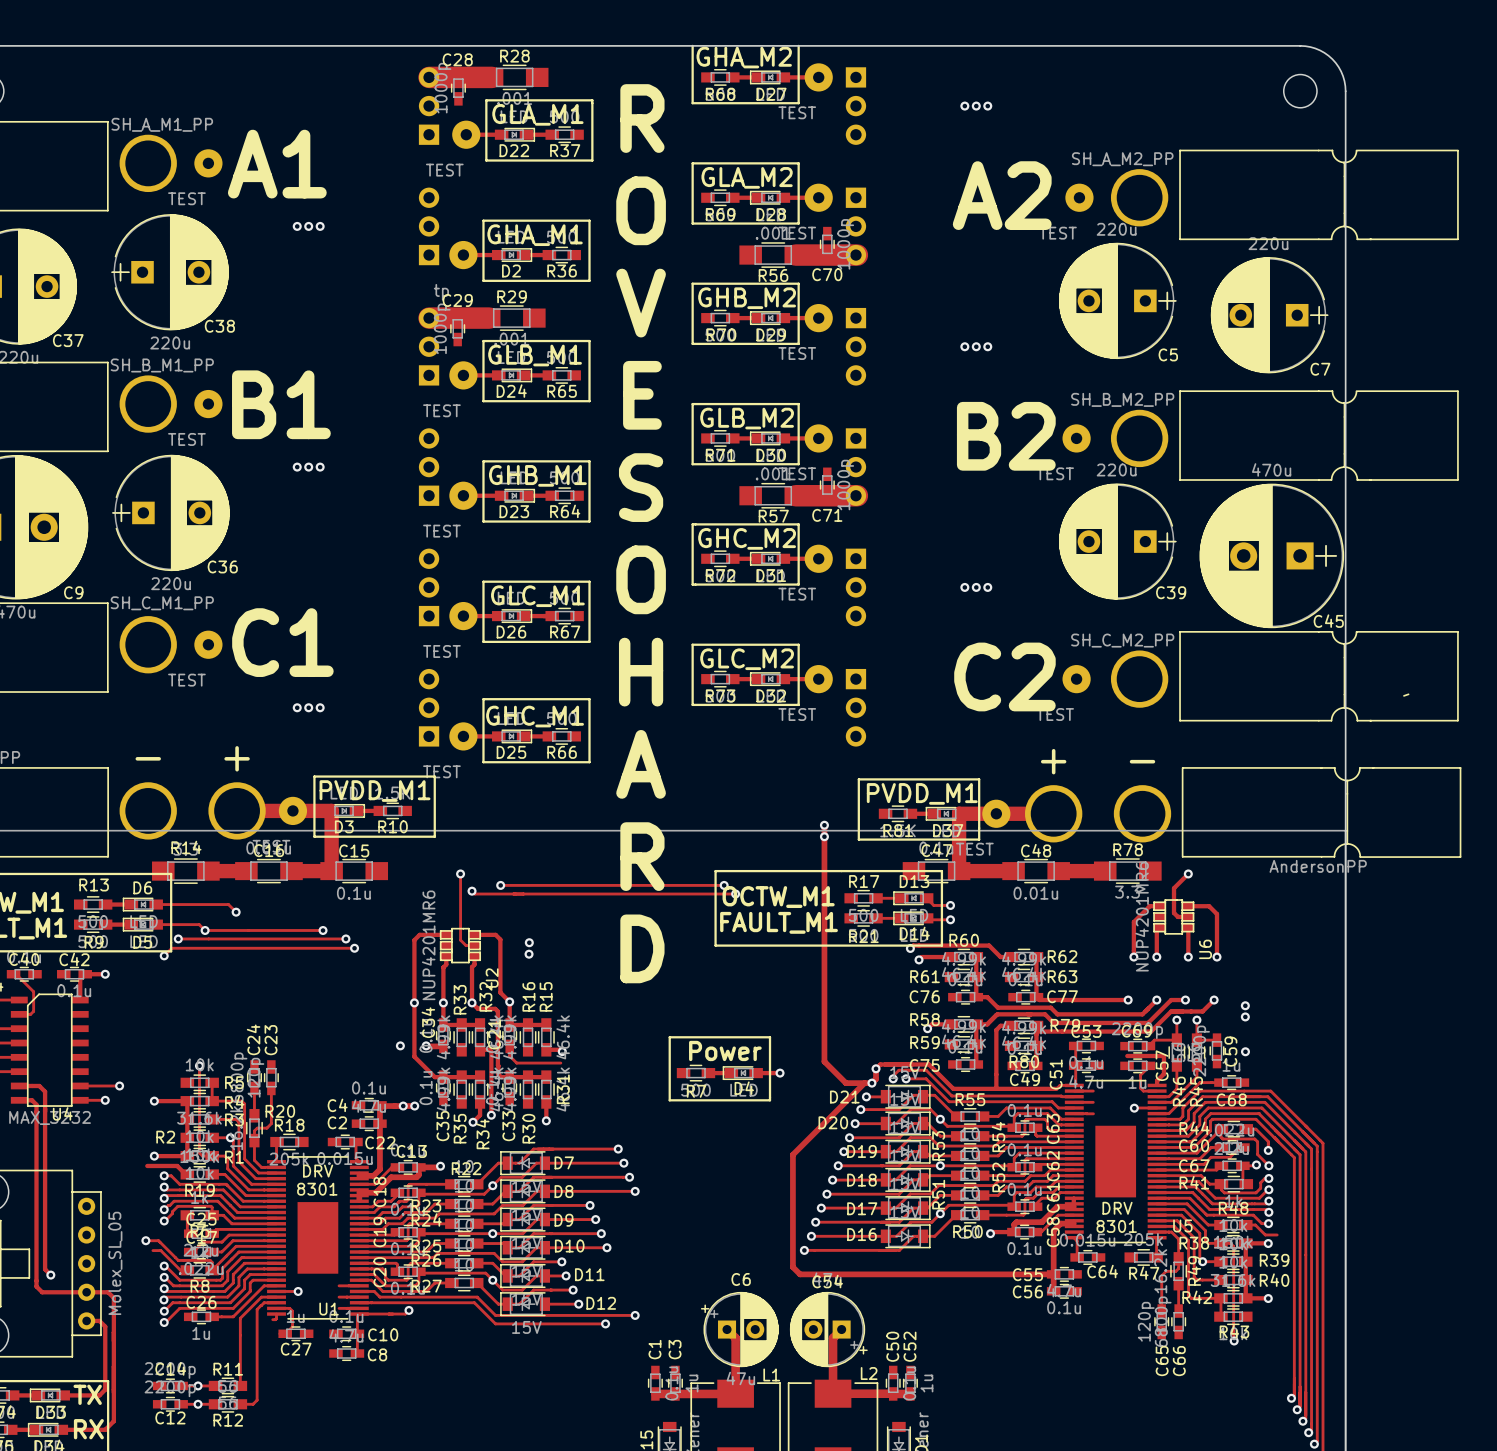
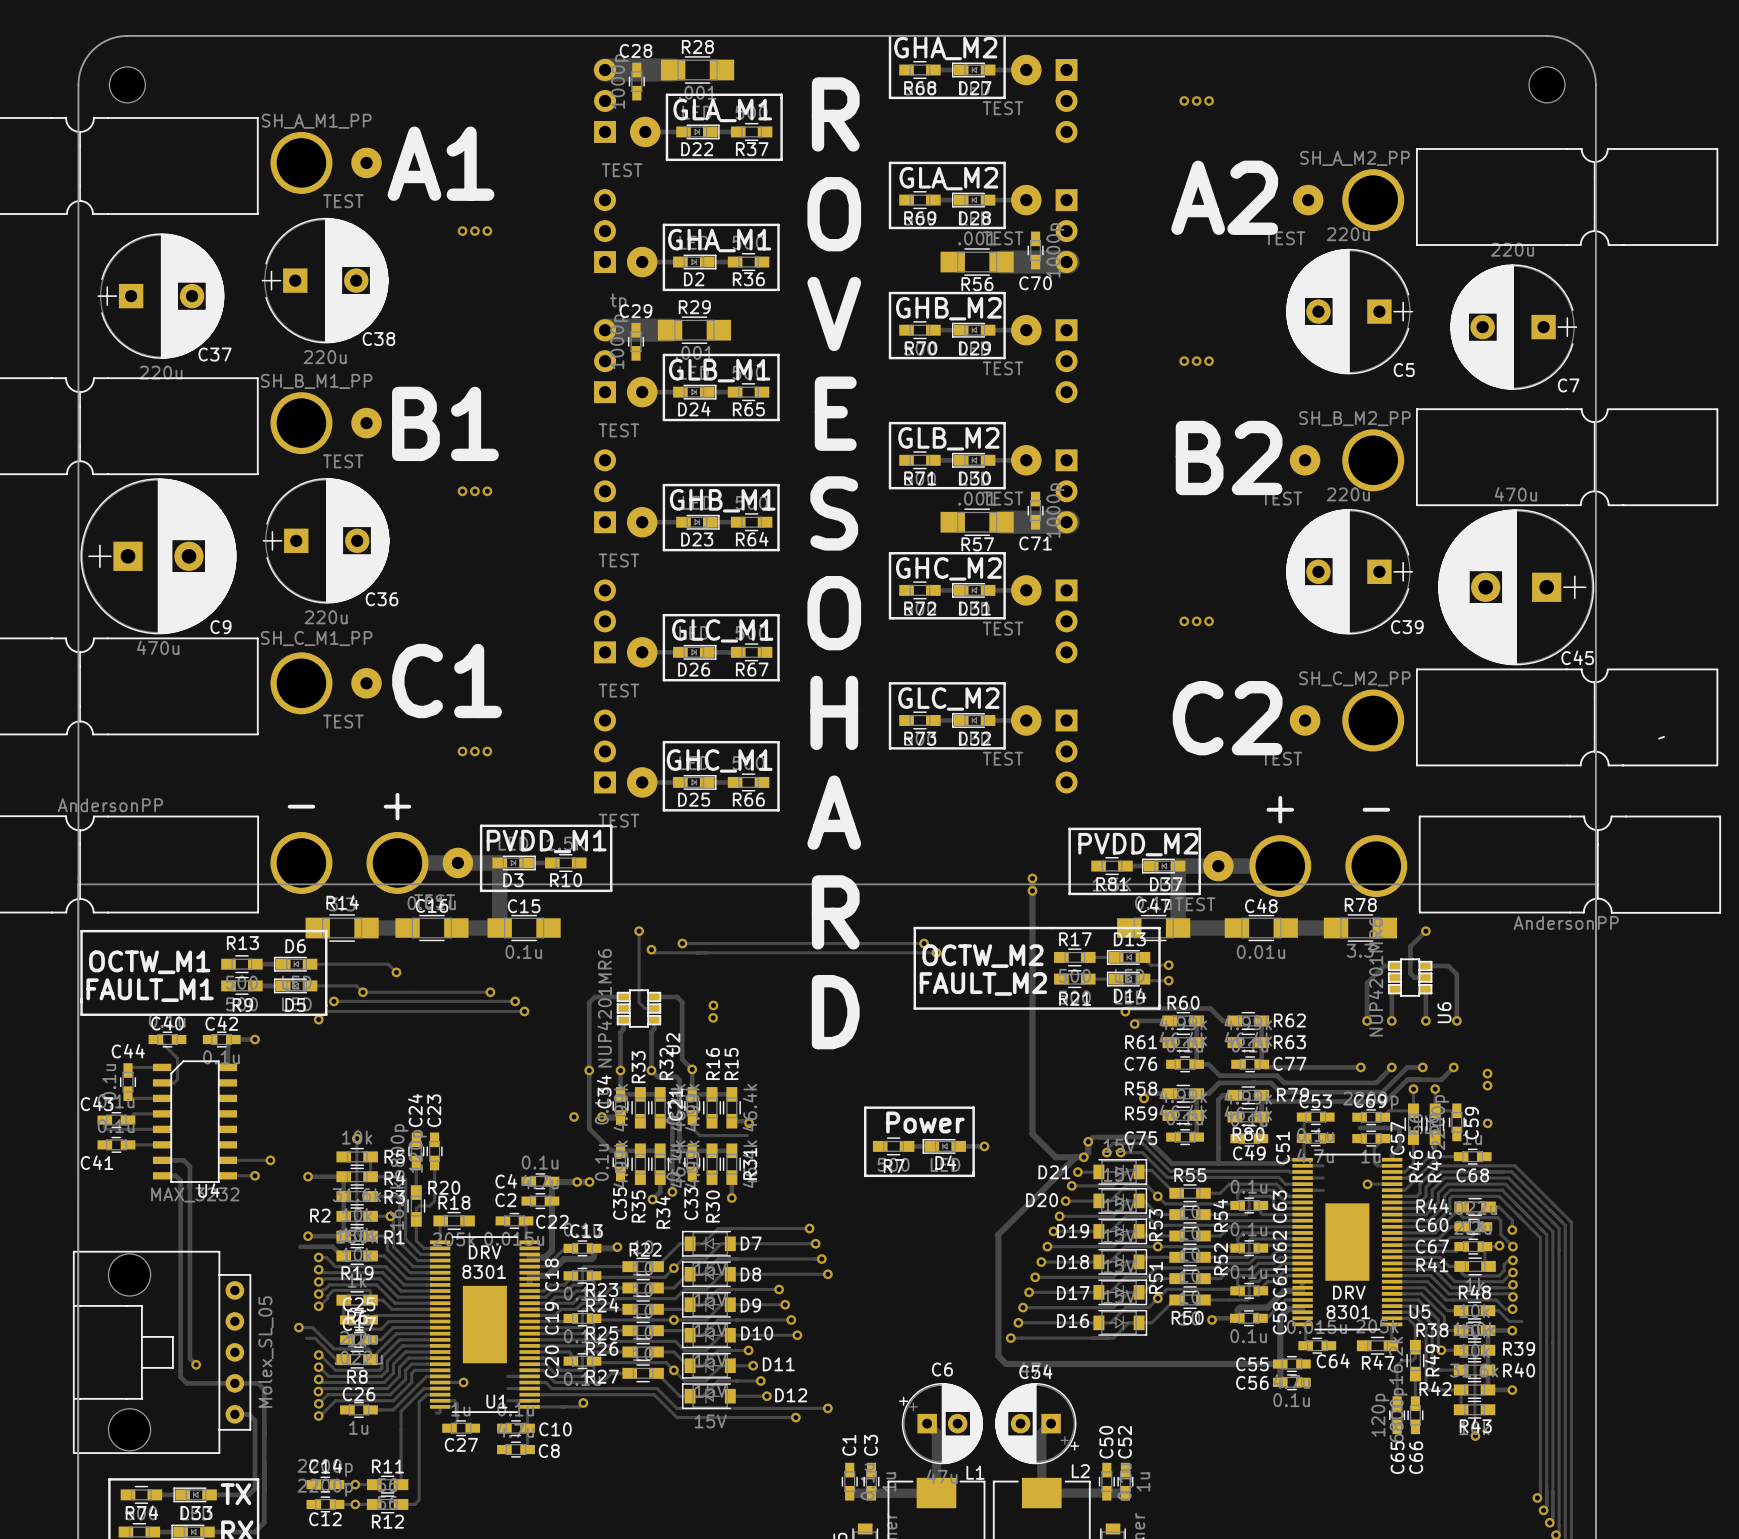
text: PVDD_M1 (922, 793) -> PVDD_M2 (1138, 844)
text: OCTW_M1 (778, 897) -> OCTW_M2 (982, 956)
text: FAULT_M1 (779, 922) -> FAULT_M2 (983, 983)

